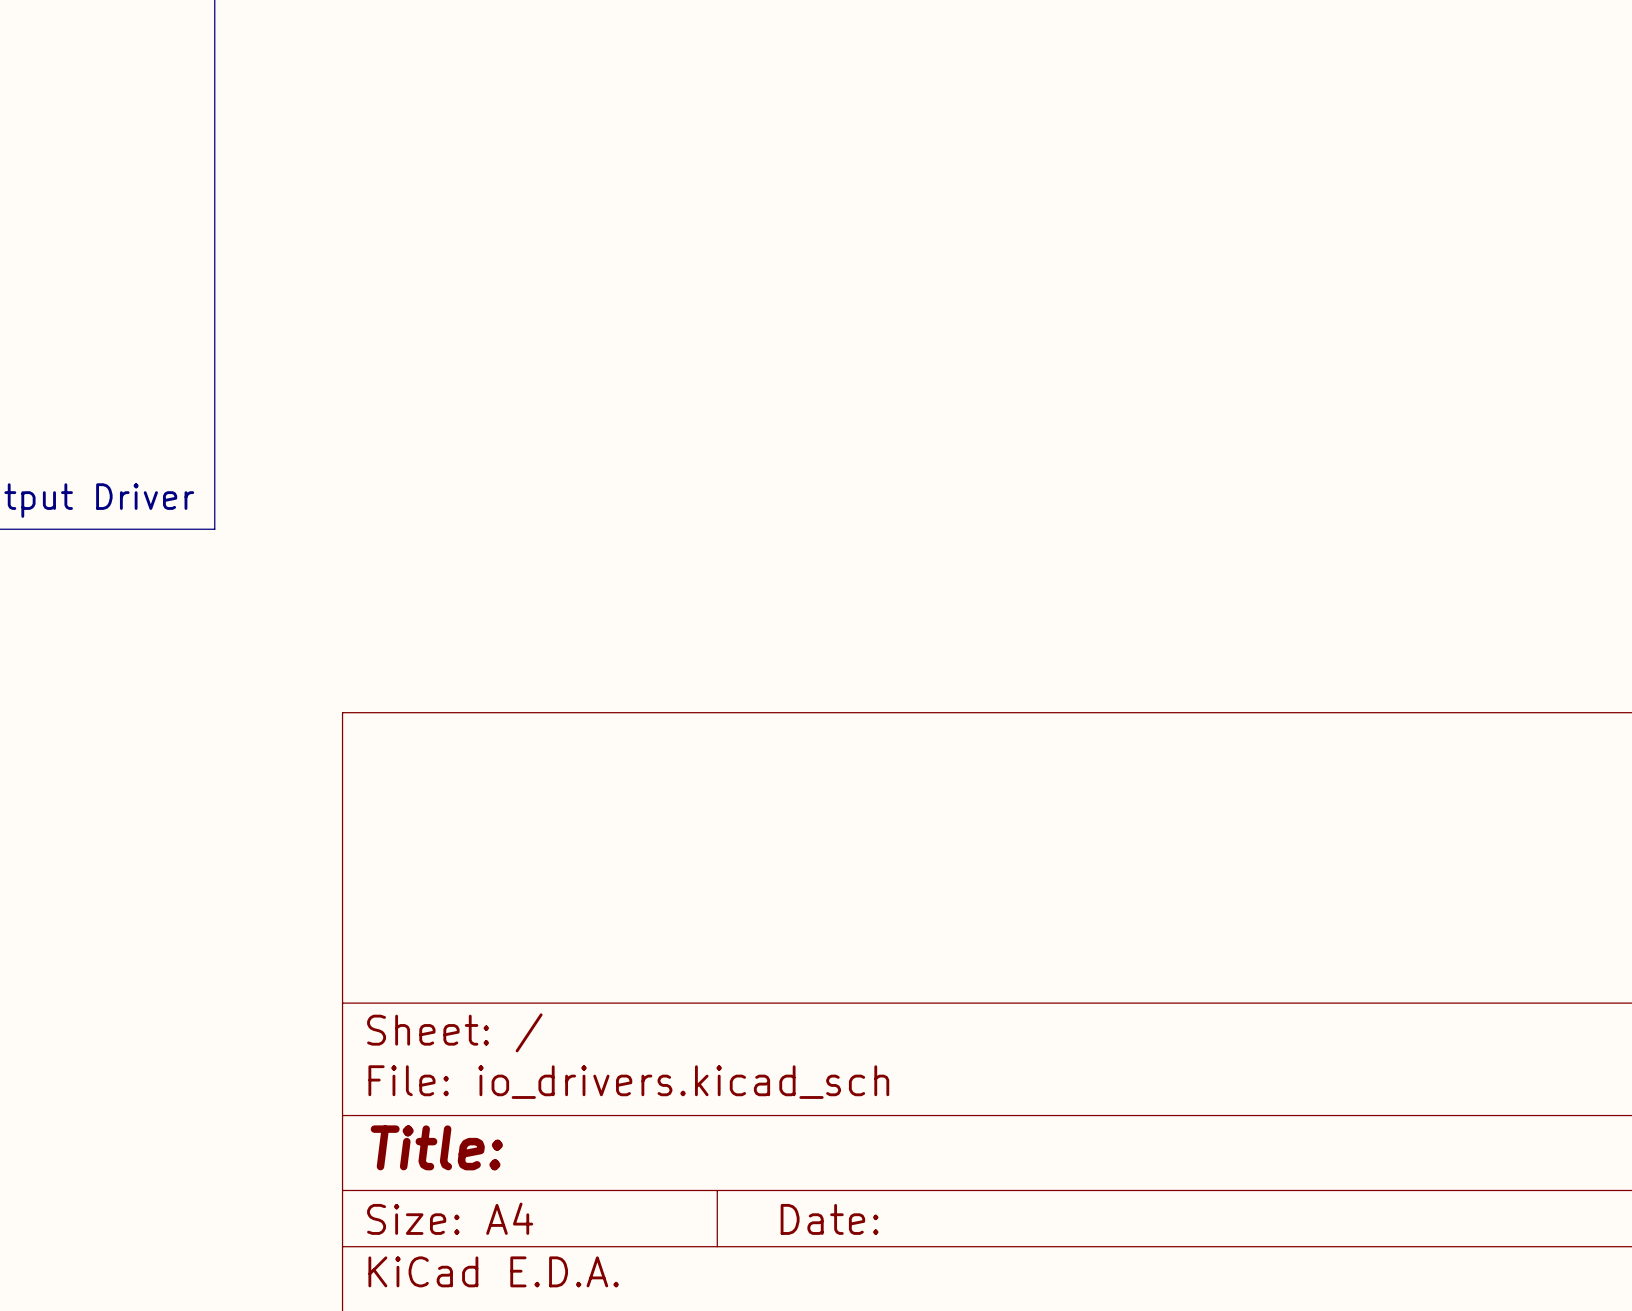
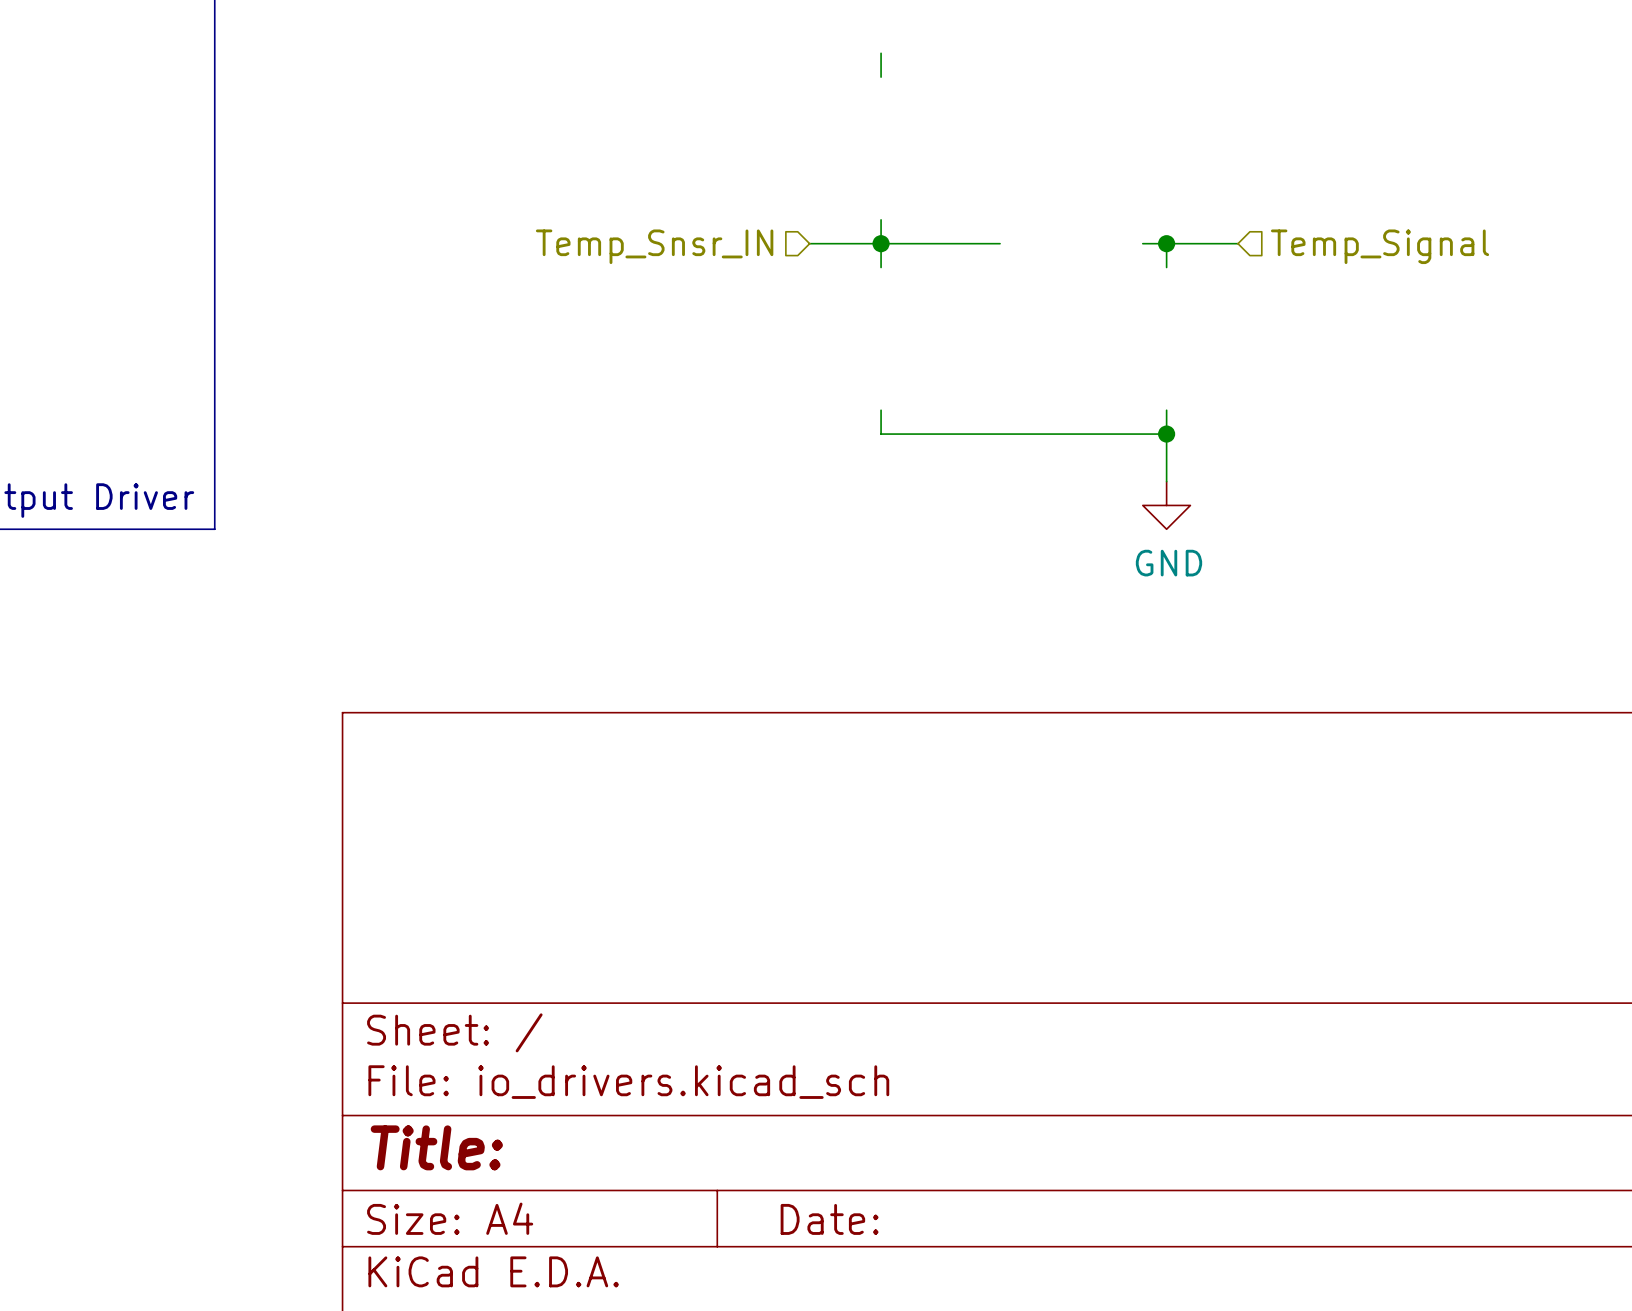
wire: none -> (881, 53) (881, 77)
wire: none -> (881, 219) (881, 267)
wire: none -> (809, 243) (1000, 243)
junction: none -> (881, 243)
wire: none -> (1142, 243) (1238, 243)
wire: none -> (1166, 243) (1166, 267)
junction: none -> (1166, 243)
hierarchical label: none -> Temp_Snsr_IN (654, 246)
hierarchical label: none -> Temp_Signal (1380, 246)
wire: none -> (881, 410) (881, 434) (1166, 434)
wire: none -> (1166, 410) (1166, 481)
junction: none -> (1166, 434)
power symbol: none -> GND (1166, 505)

